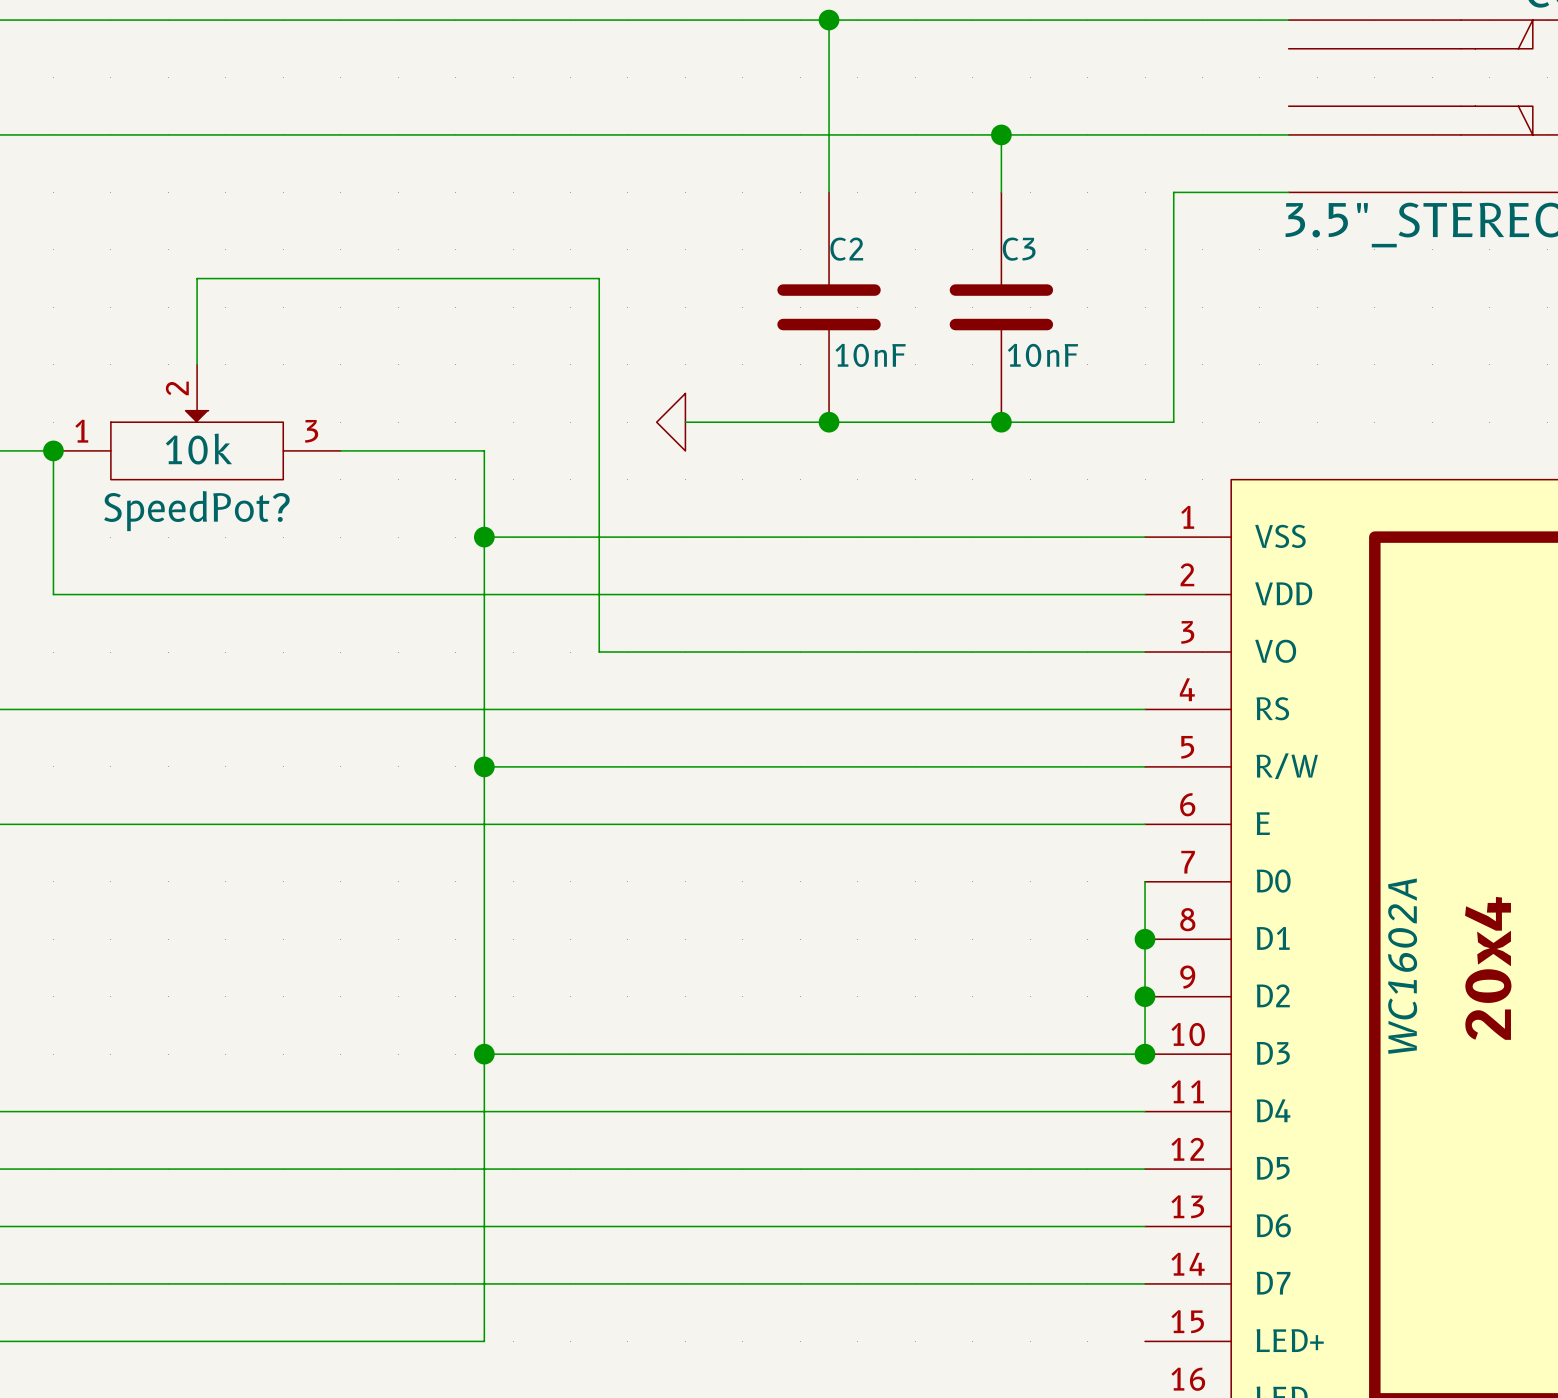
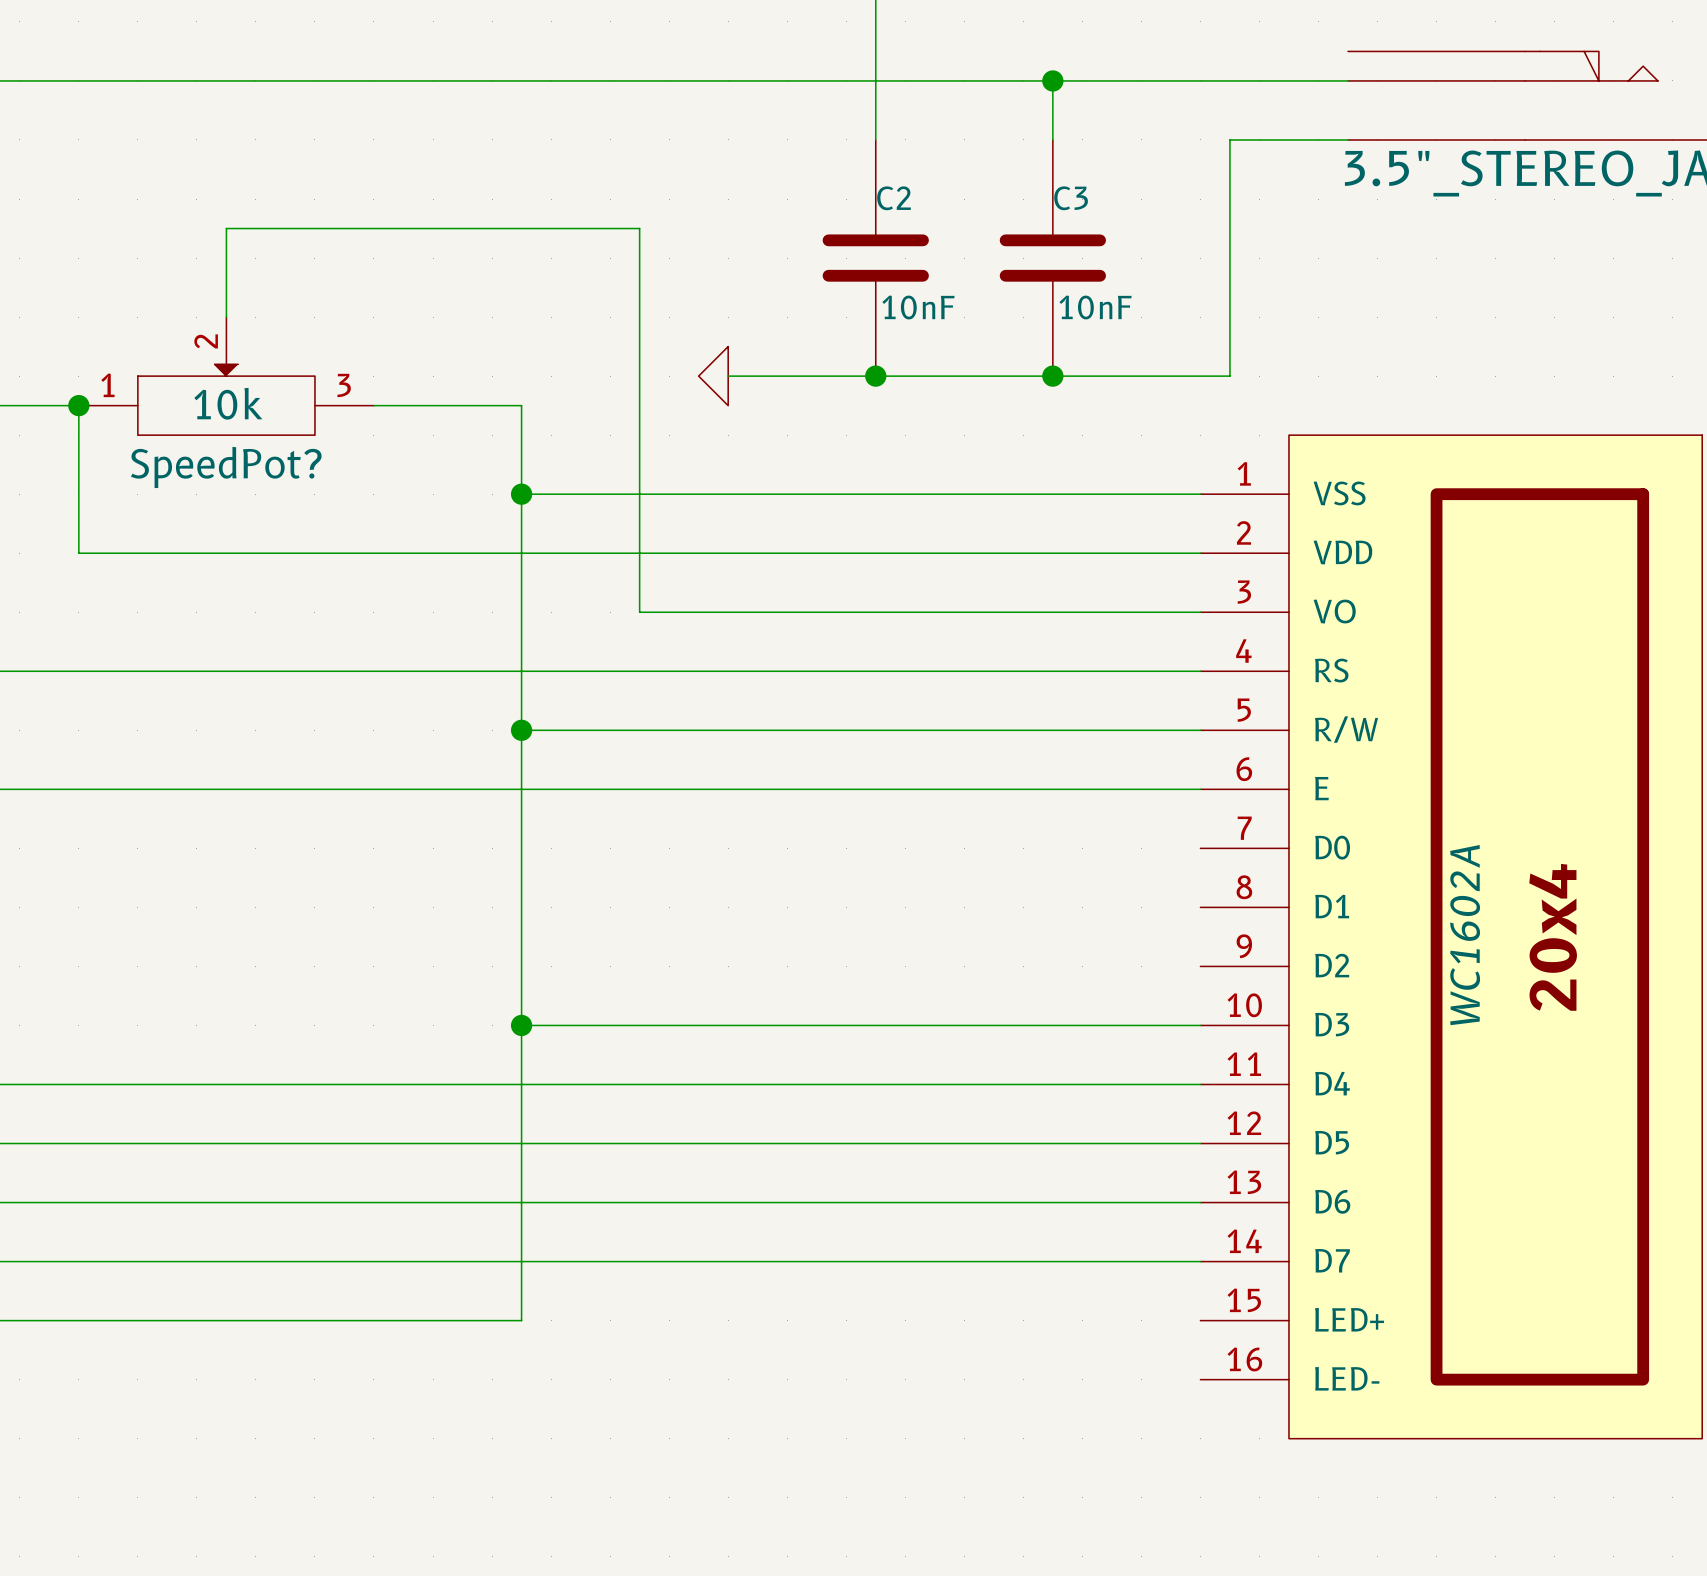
wire: (1145, 881) (1145, 1054) -> none
junction: (1145, 939) -> none
junction: (1145, 996) -> none
junction: (1145, 1054) -> none

